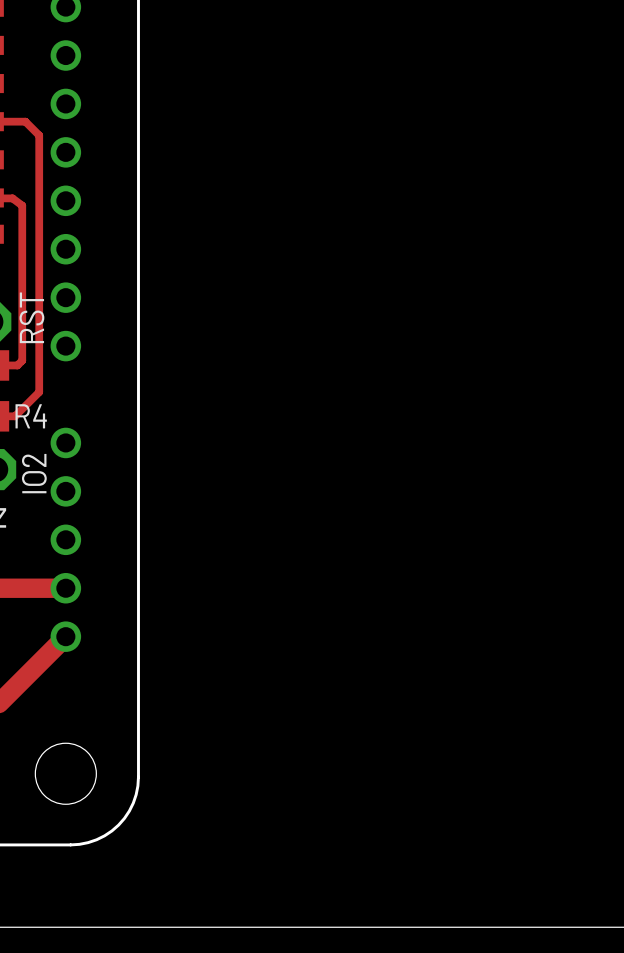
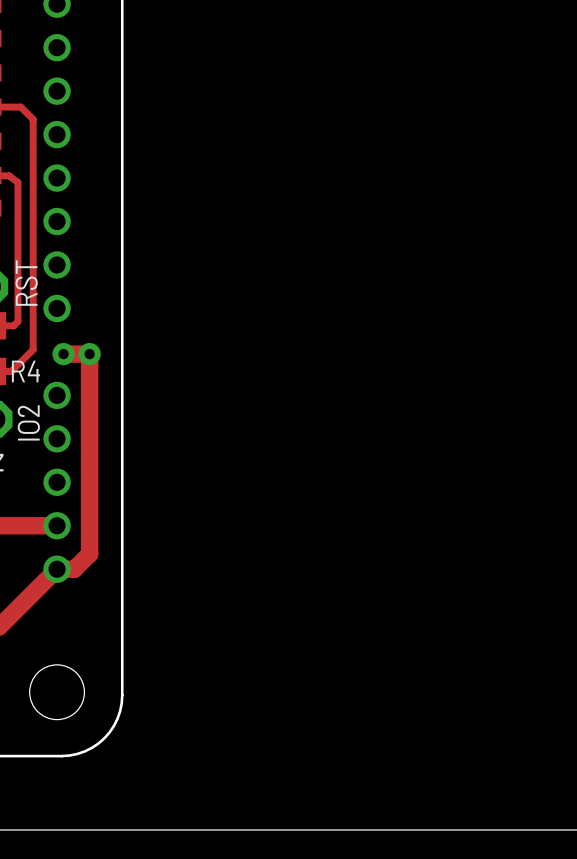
track: none -> (63, 354) (89, 354) (89, 554) (74, 569) (57, 569)
via: none -> (63, 354)
via: none -> (89, 354)

